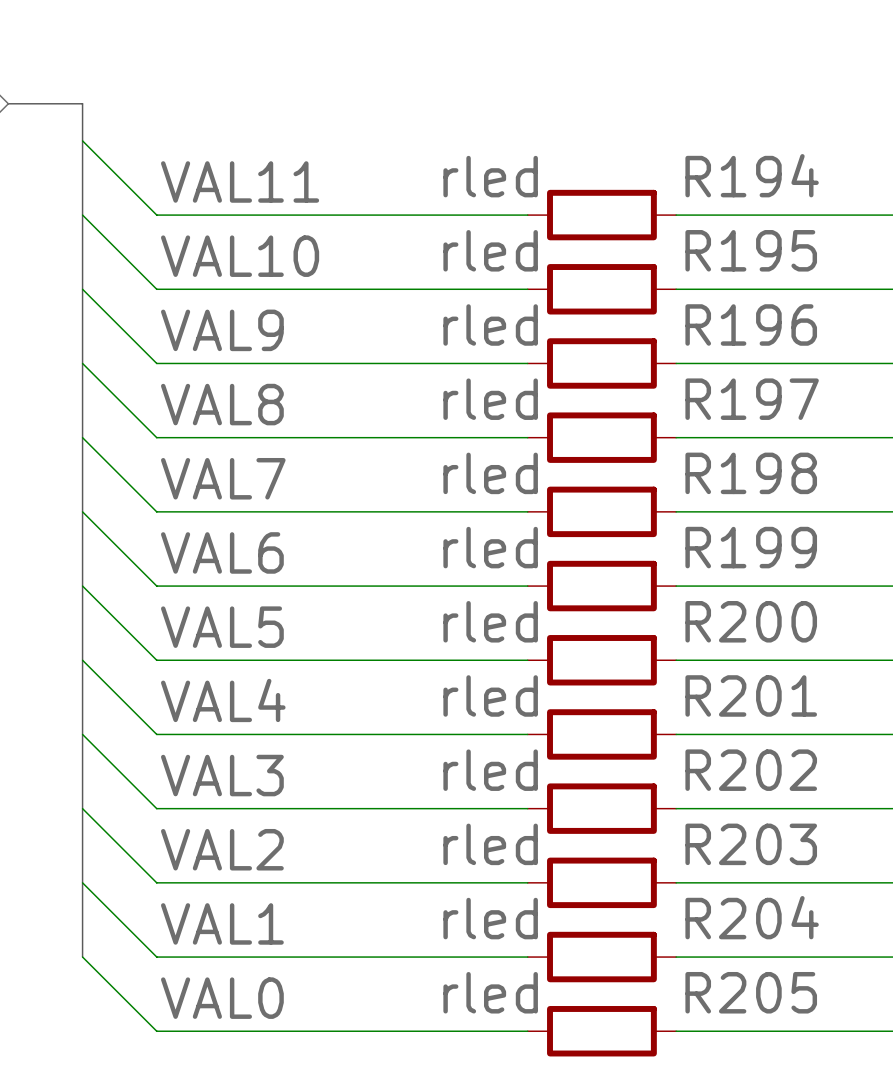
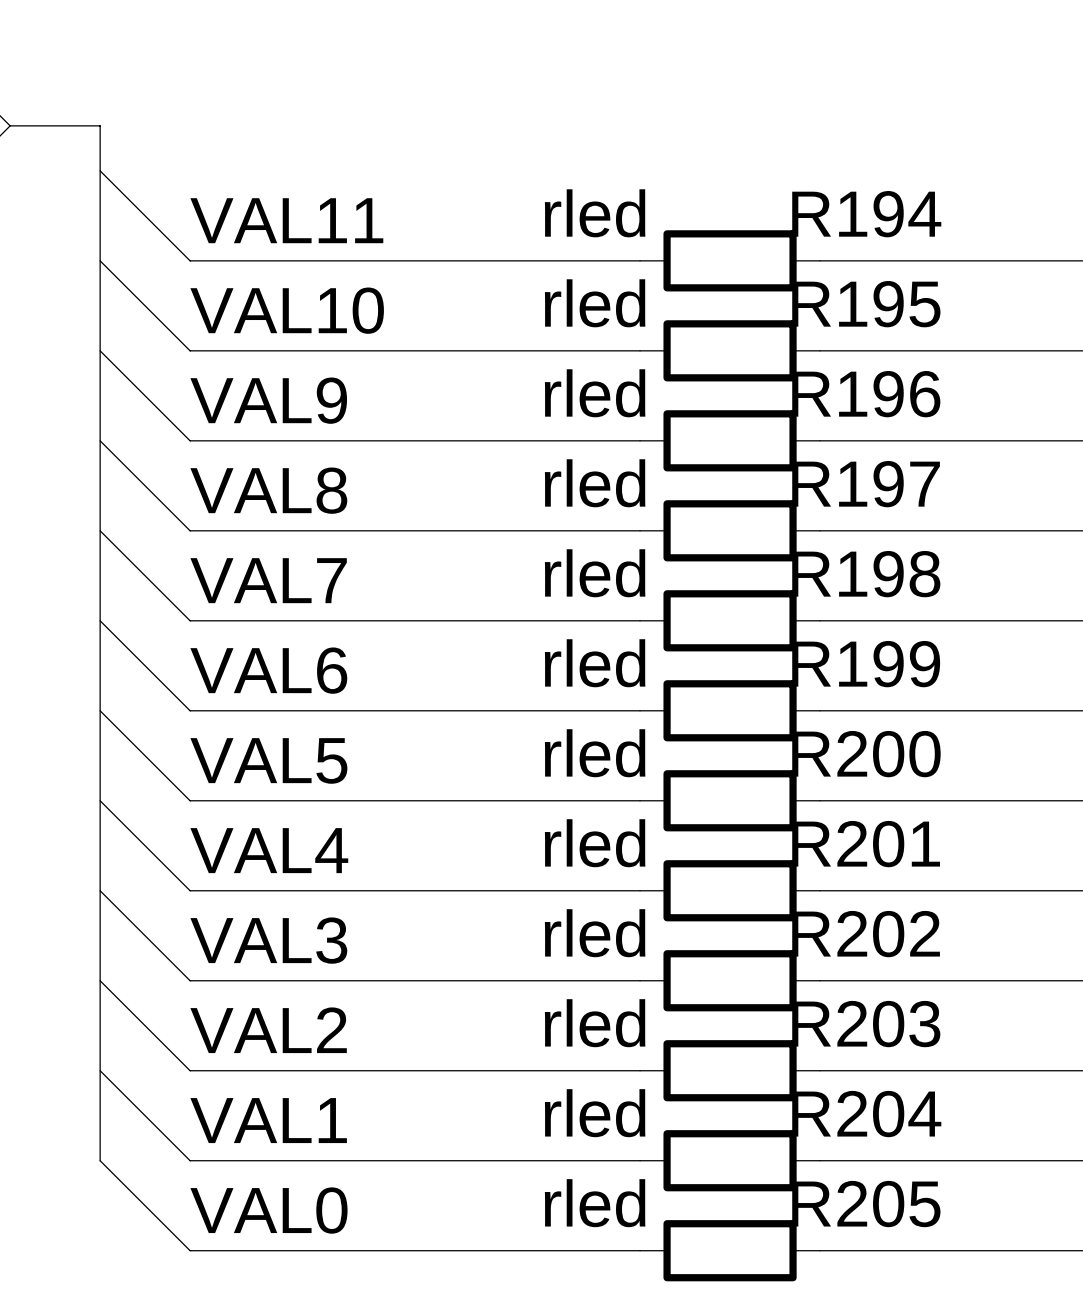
R194 name position: R194 (752, 175) -> R194 (866, 214)
R195 name position: R195 (751, 250) -> R195 (866, 304)
R196 name position: R196 (751, 324) -> R196 (866, 394)
R197 name position: R197 (752, 399) -> R197 (866, 484)
R198 name position: R198 (751, 473) -> R198 (866, 574)
R199 name position: R199 (751, 547) -> R199 (866, 664)
R200 name position: R200 (751, 621) -> R200 (866, 754)
R201 name position: R201 (751, 695) -> R201 (866, 844)
R202 name position: R202 (751, 770) -> R202 (866, 934)
R203 name position: R203 (751, 844) -> R203 (866, 1024)
R204 name position: R204 (752, 917) -> R204 (866, 1114)
R205 name position: R205 (751, 992) -> R205 (866, 1204)

